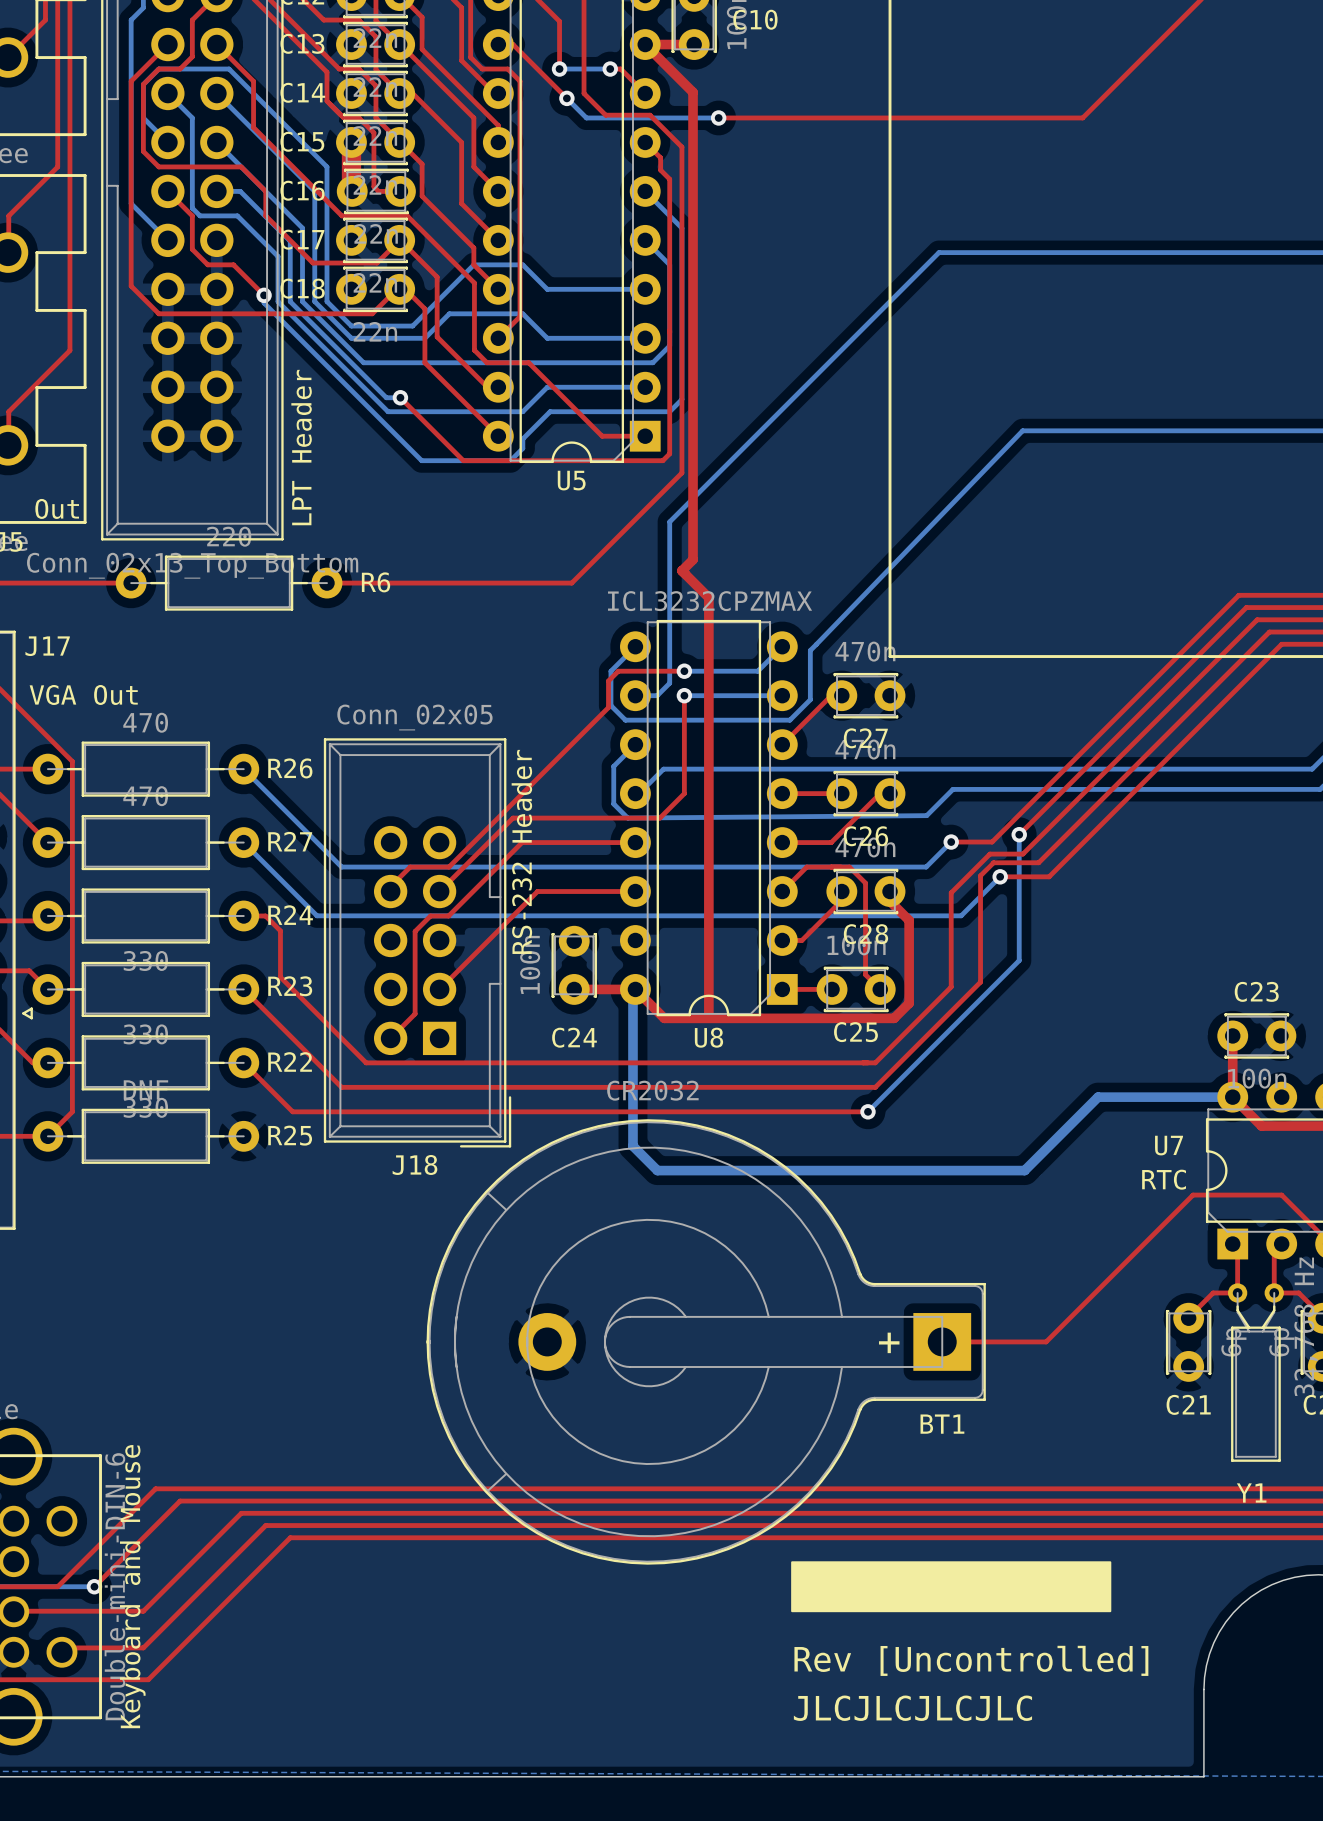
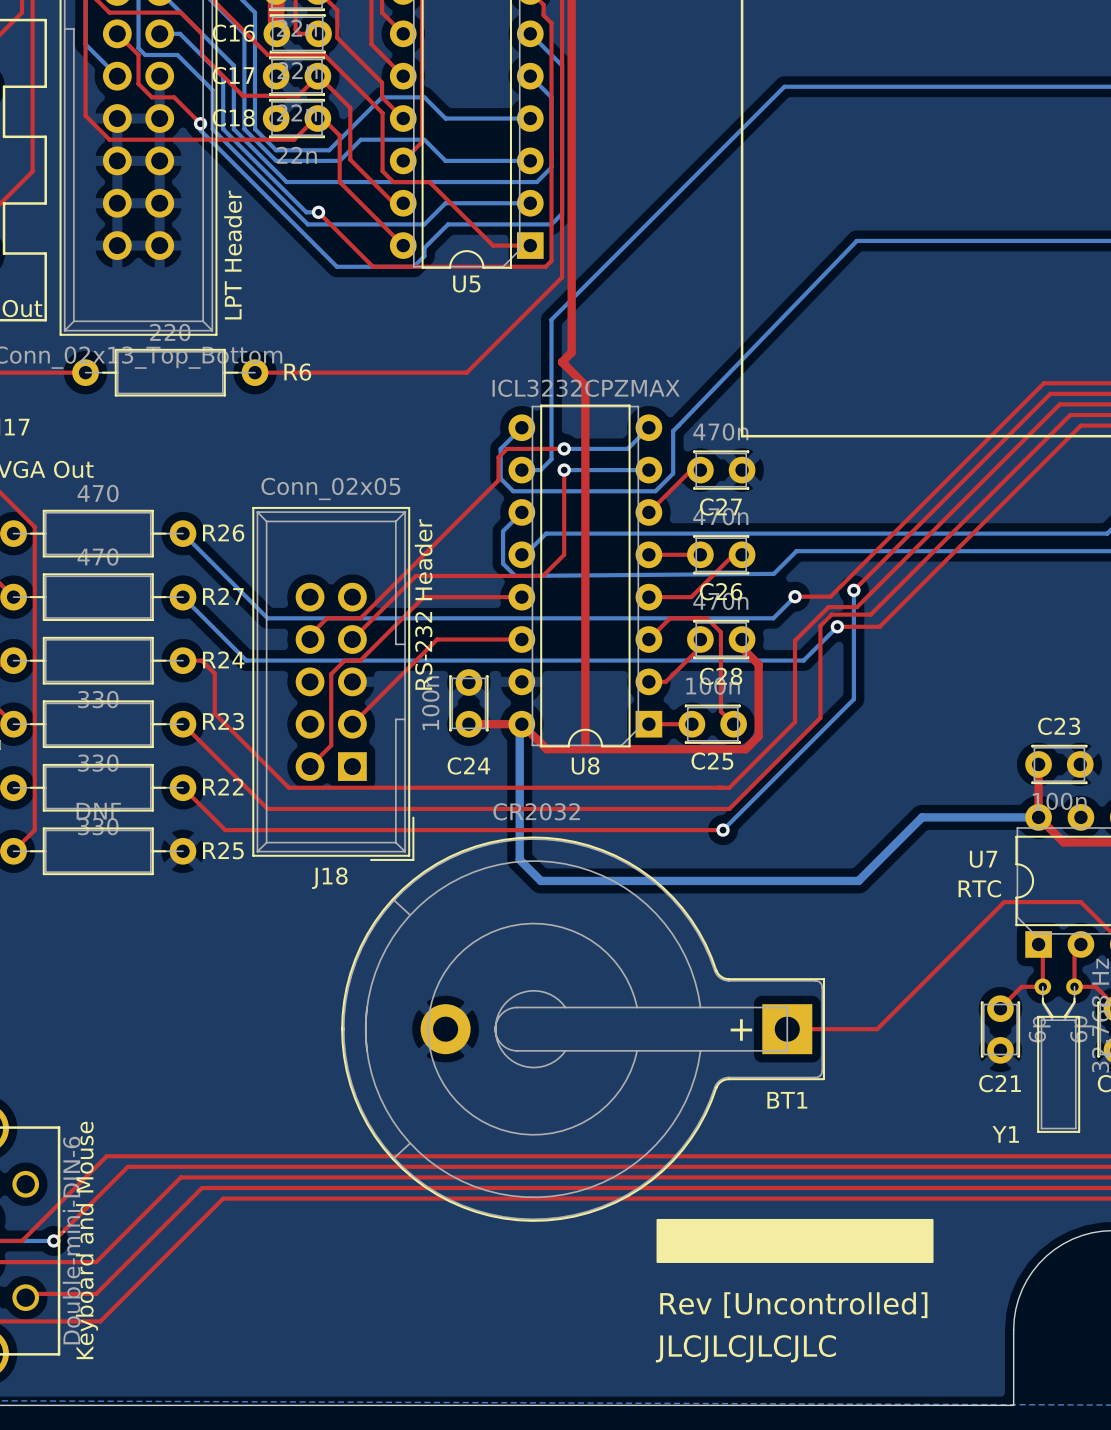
Y1 name position: Y1 (1251, 1492) -> Y1 (1005, 1134)

